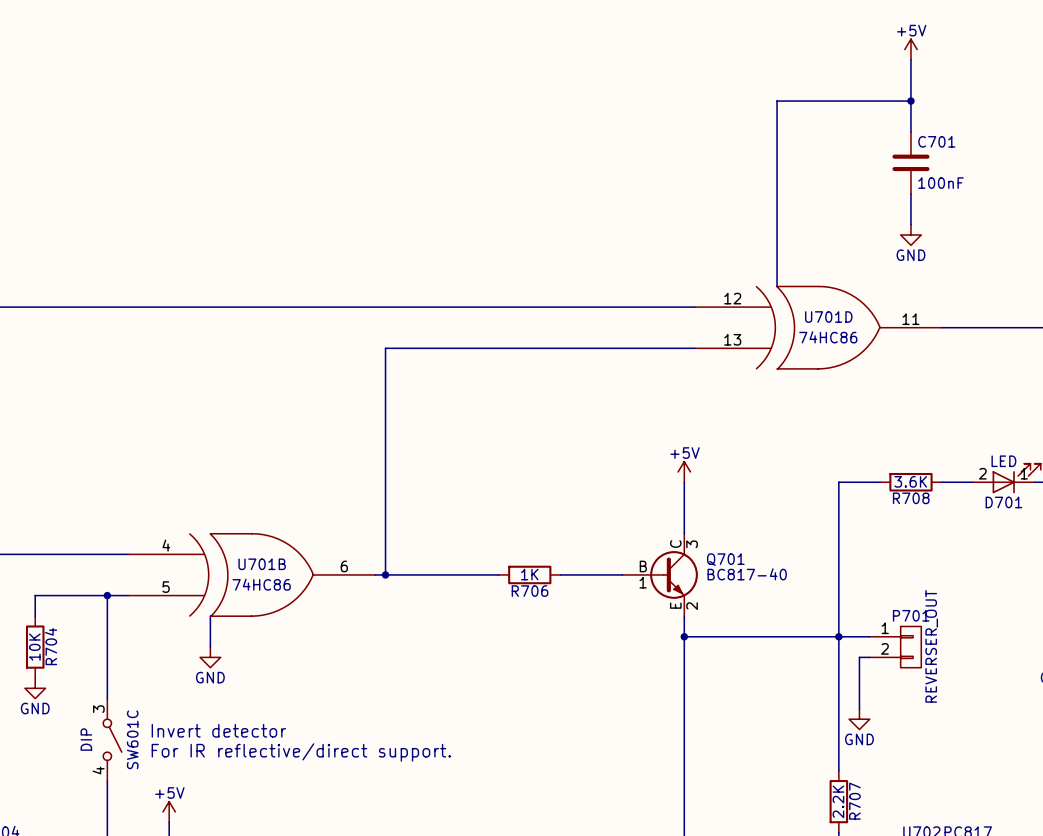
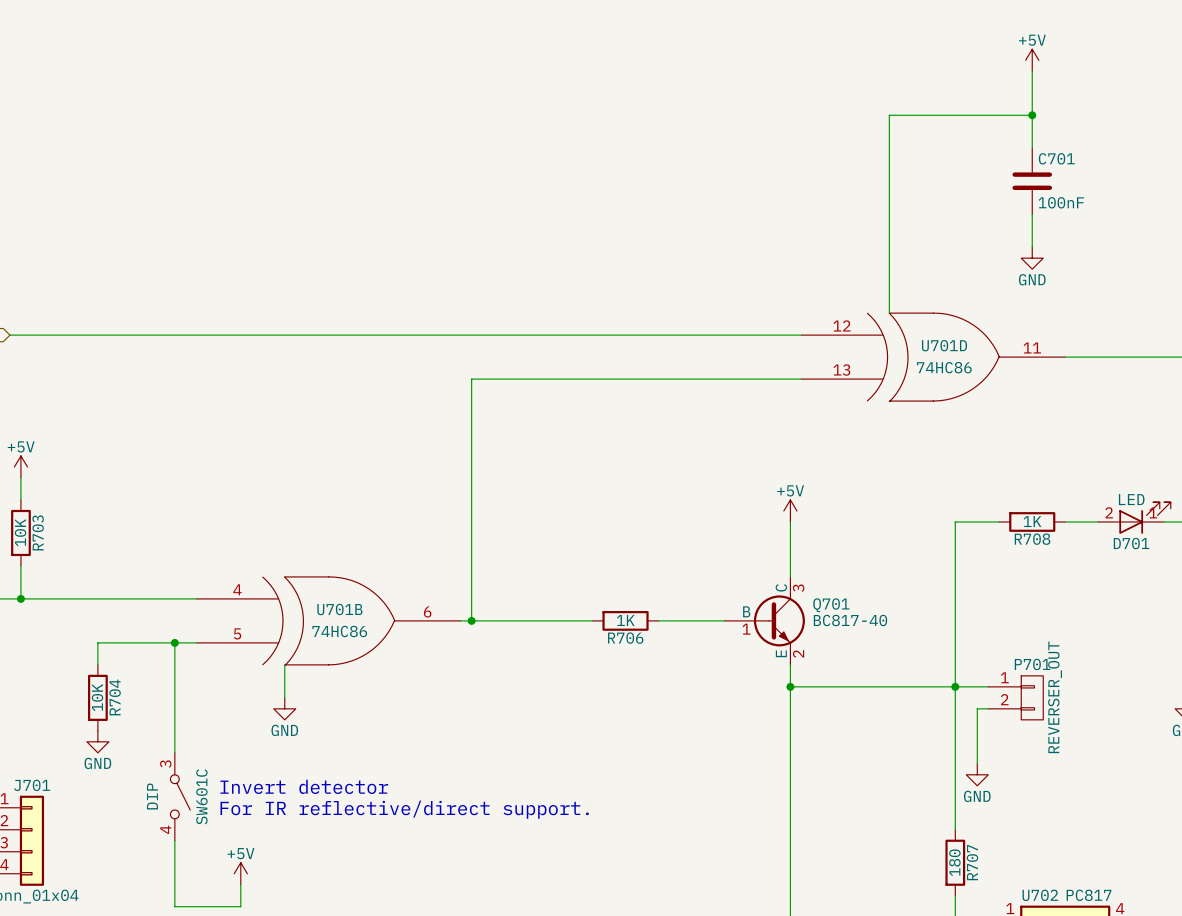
R708 value: 3.6K (910, 481) -> 1K (1032, 521)
R707 value: 2.2K (838, 801) -> 180 (954, 862)

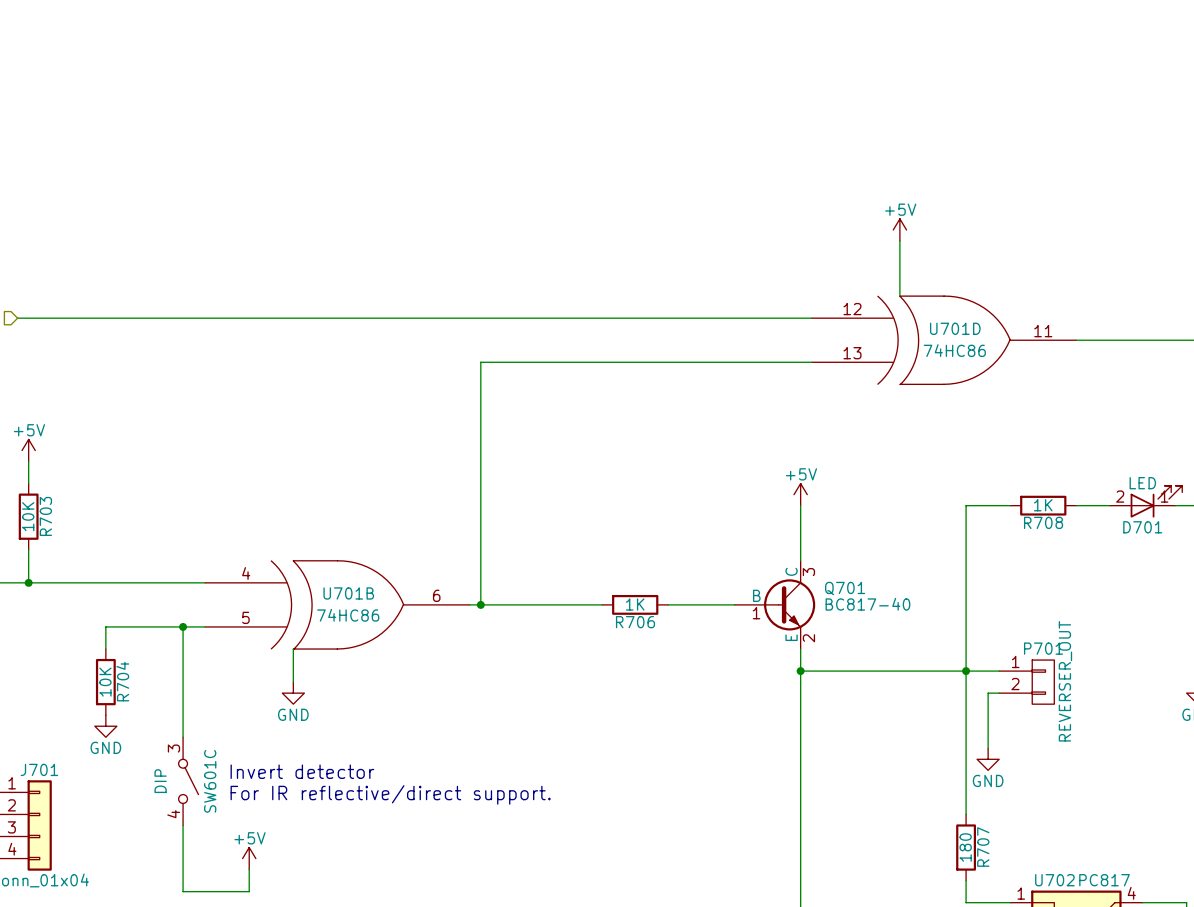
power symbol: +5V (1032, 60) -> none
wire: (1032, 71) (1032, 148) -> none
wire: (1032, 115) (889, 115) (889, 258) -> none
junction: (1032, 115) -> none
C701: 100nF (1032, 181) -> none
wire: (1032, 214) (1032, 247) -> none
power symbol: none -> +5V (899, 229)
power symbol: GND (1032, 258) -> none

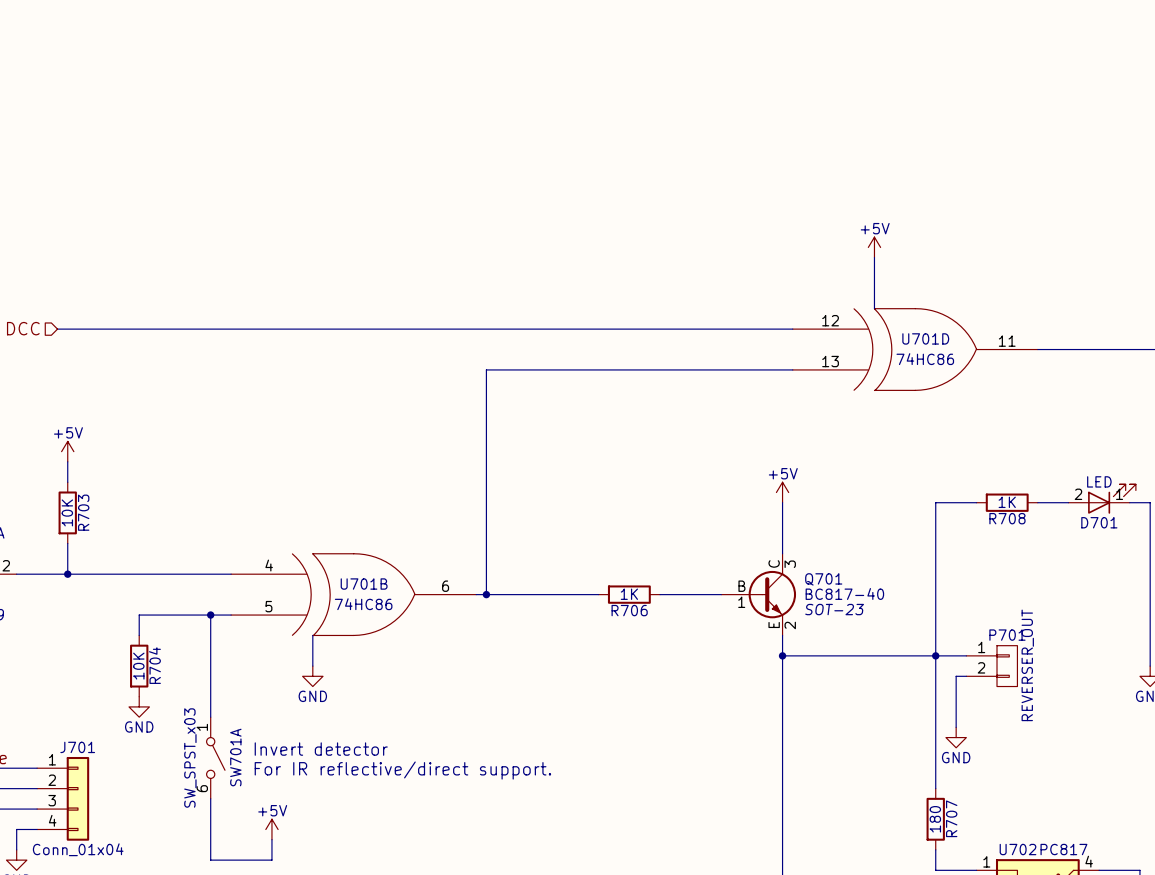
Q701 text: none -> SOT-23 (834, 609)
SW601C pin number: 3 (173, 748) -> 1 (202, 727)
SW601C value: DIP (160, 781) -> SW_SPST_x03 (190, 758)
SW601C name: SW601C (210, 781) -> SW701A (235, 757)
SW601C pin number: 4 (173, 814) -> 6 (202, 788)

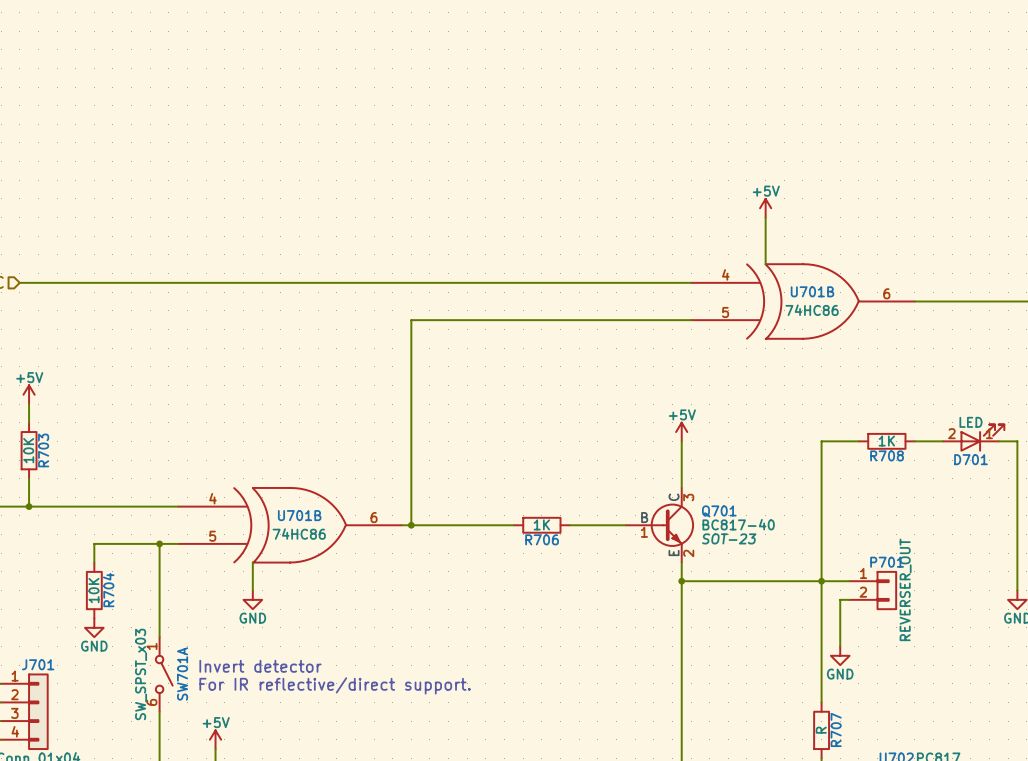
U701D pin number: 12 (830, 320) -> 4 (725, 274)
U701D name: U701D (925, 338) -> U701B (812, 291)
U701D pin number: 11 (1007, 341) -> 6 (886, 293)
U701D pin number: 13 (830, 361) -> 5 (725, 312)
R707 value: 180 (935, 819) -> R (821, 730)

